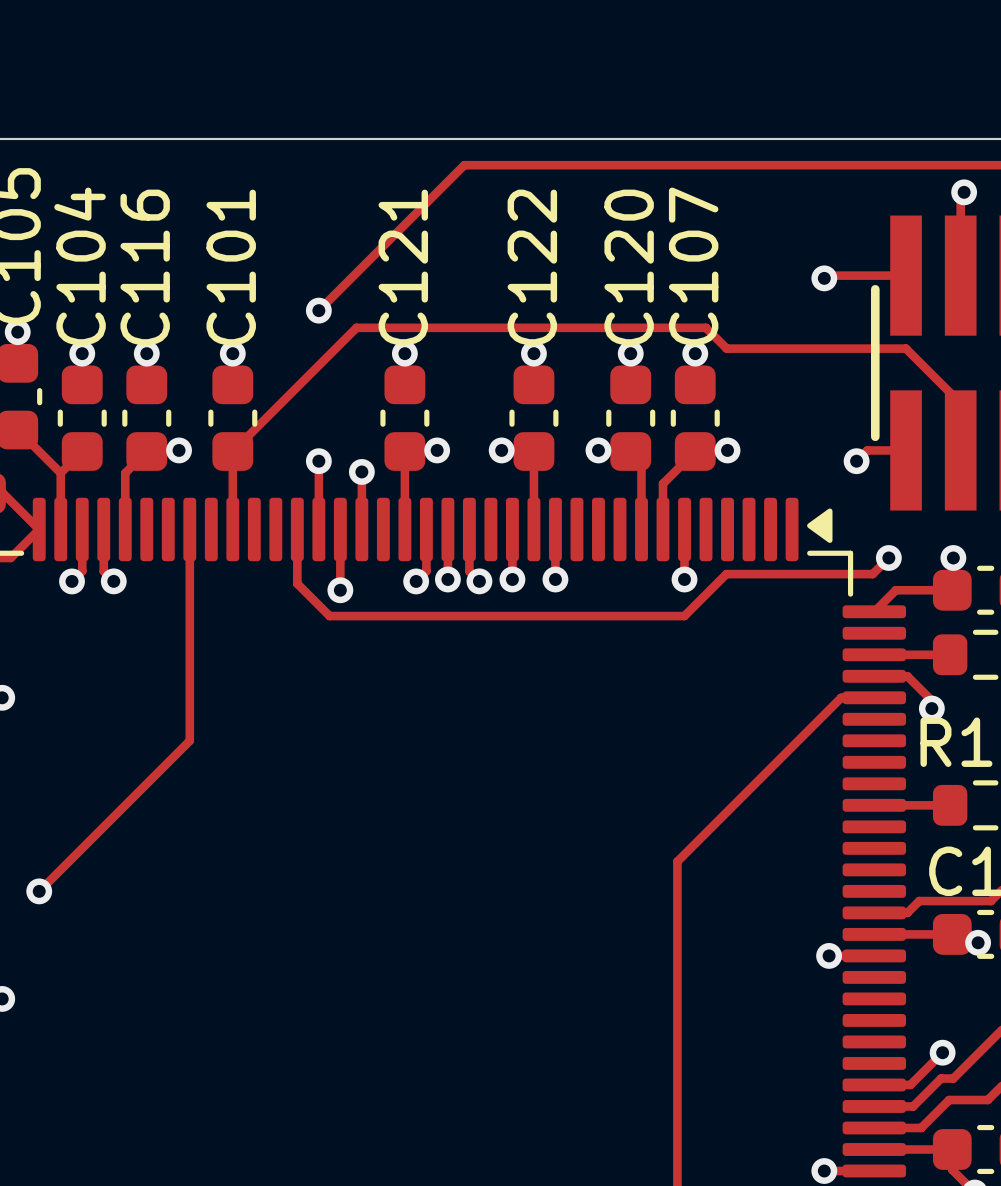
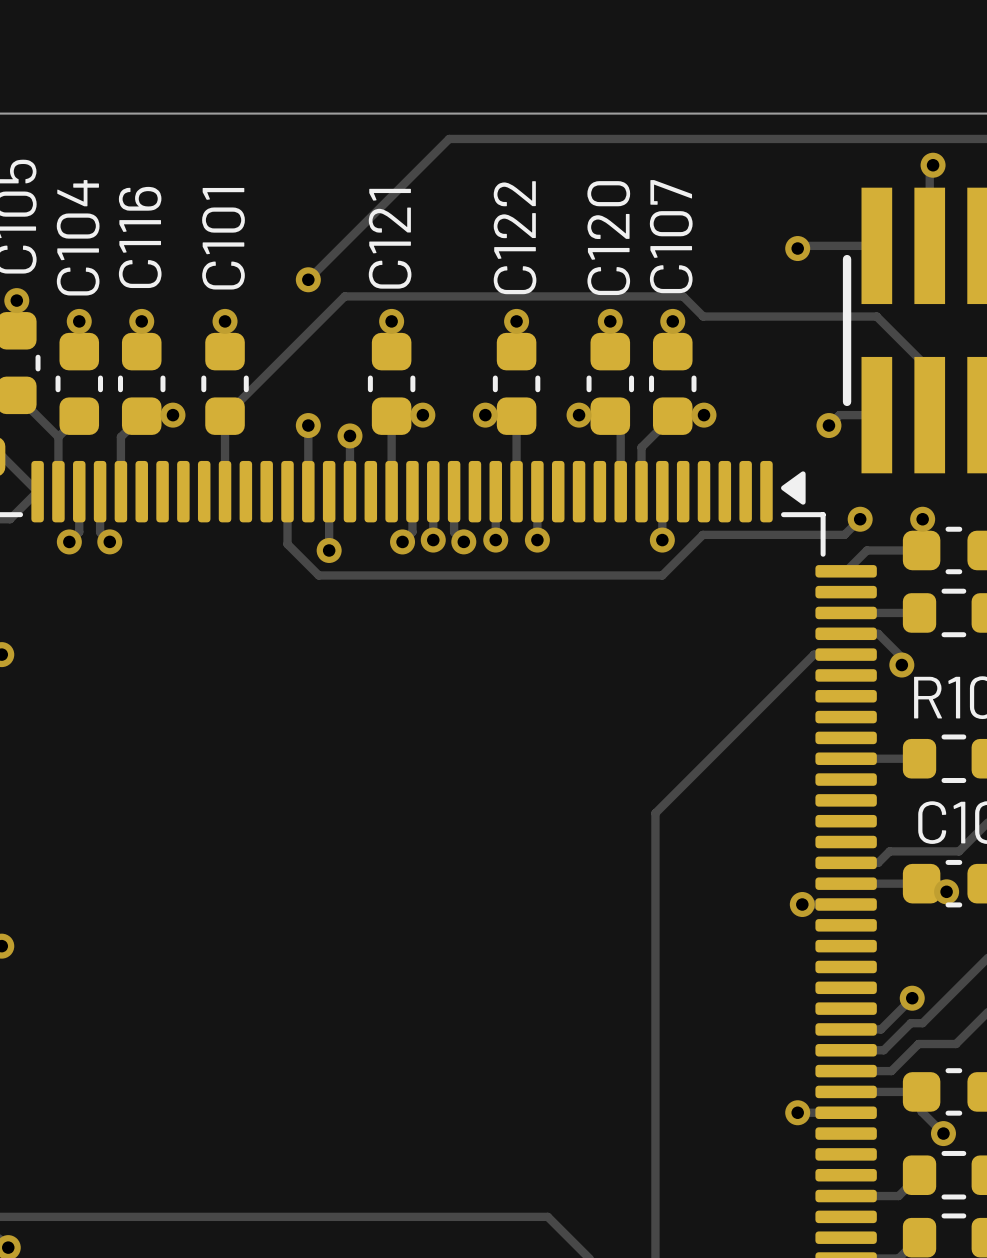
track: (189, 529) (189, 740) (39, 891) -> none
via: (39, 891) -> none

